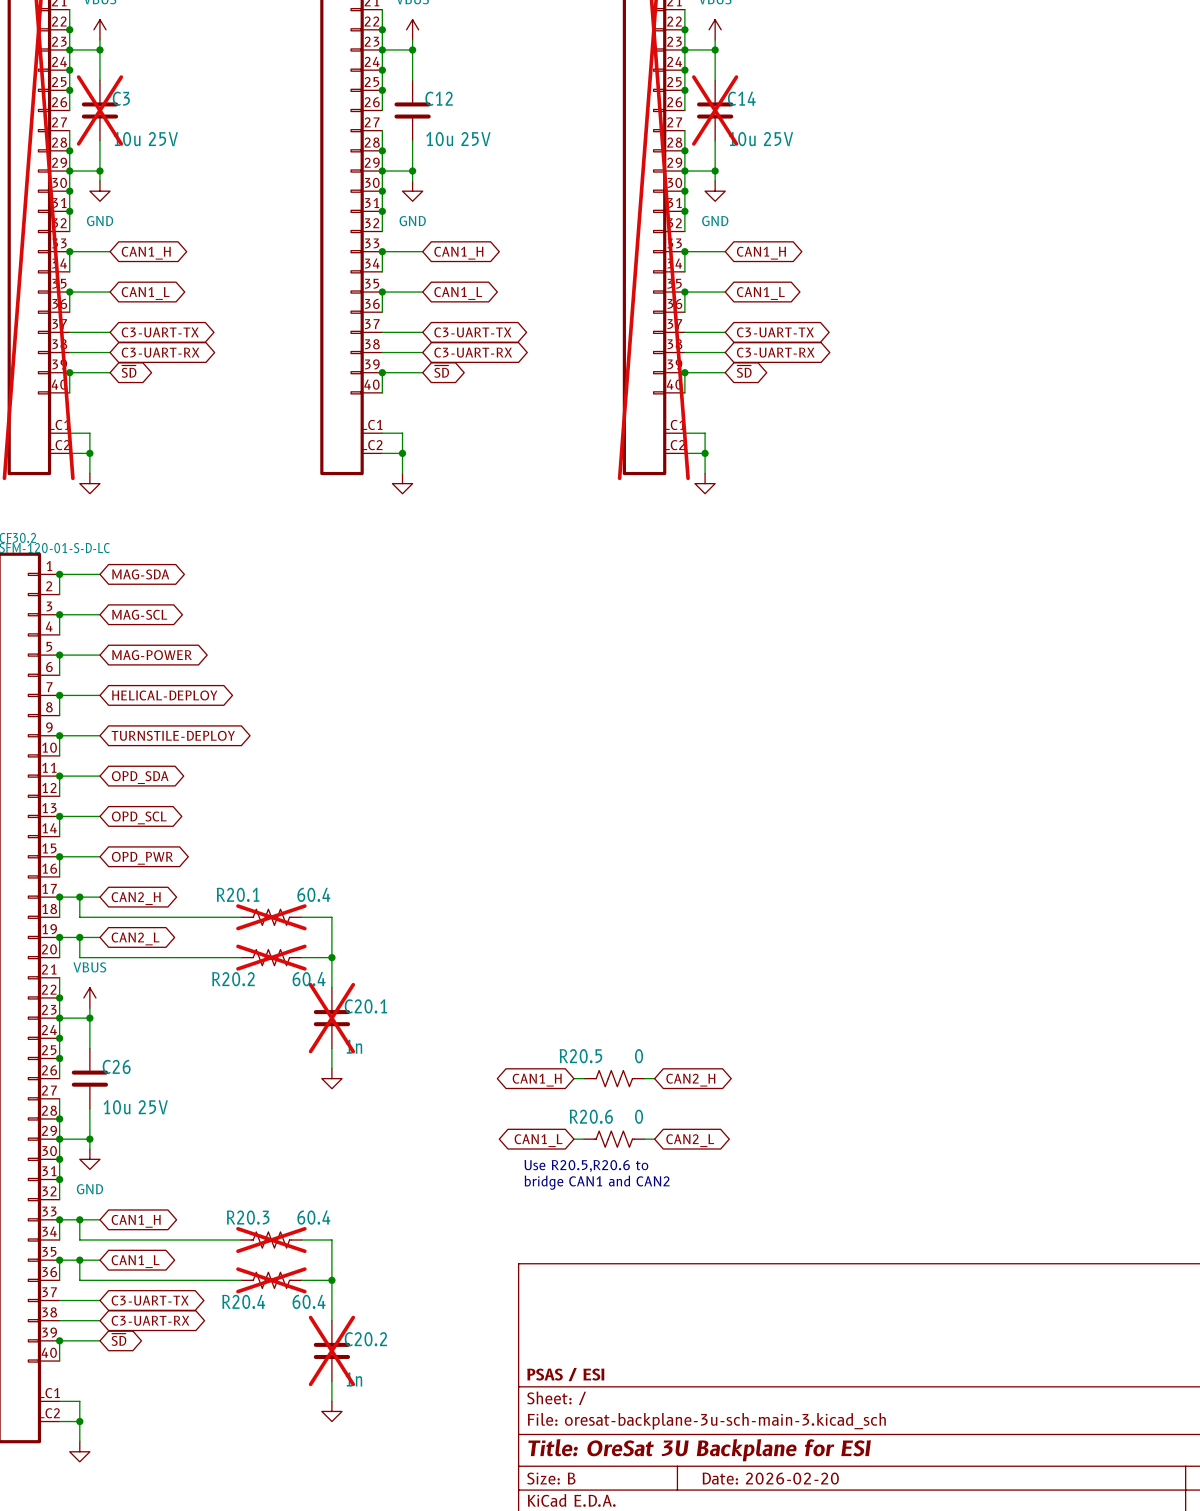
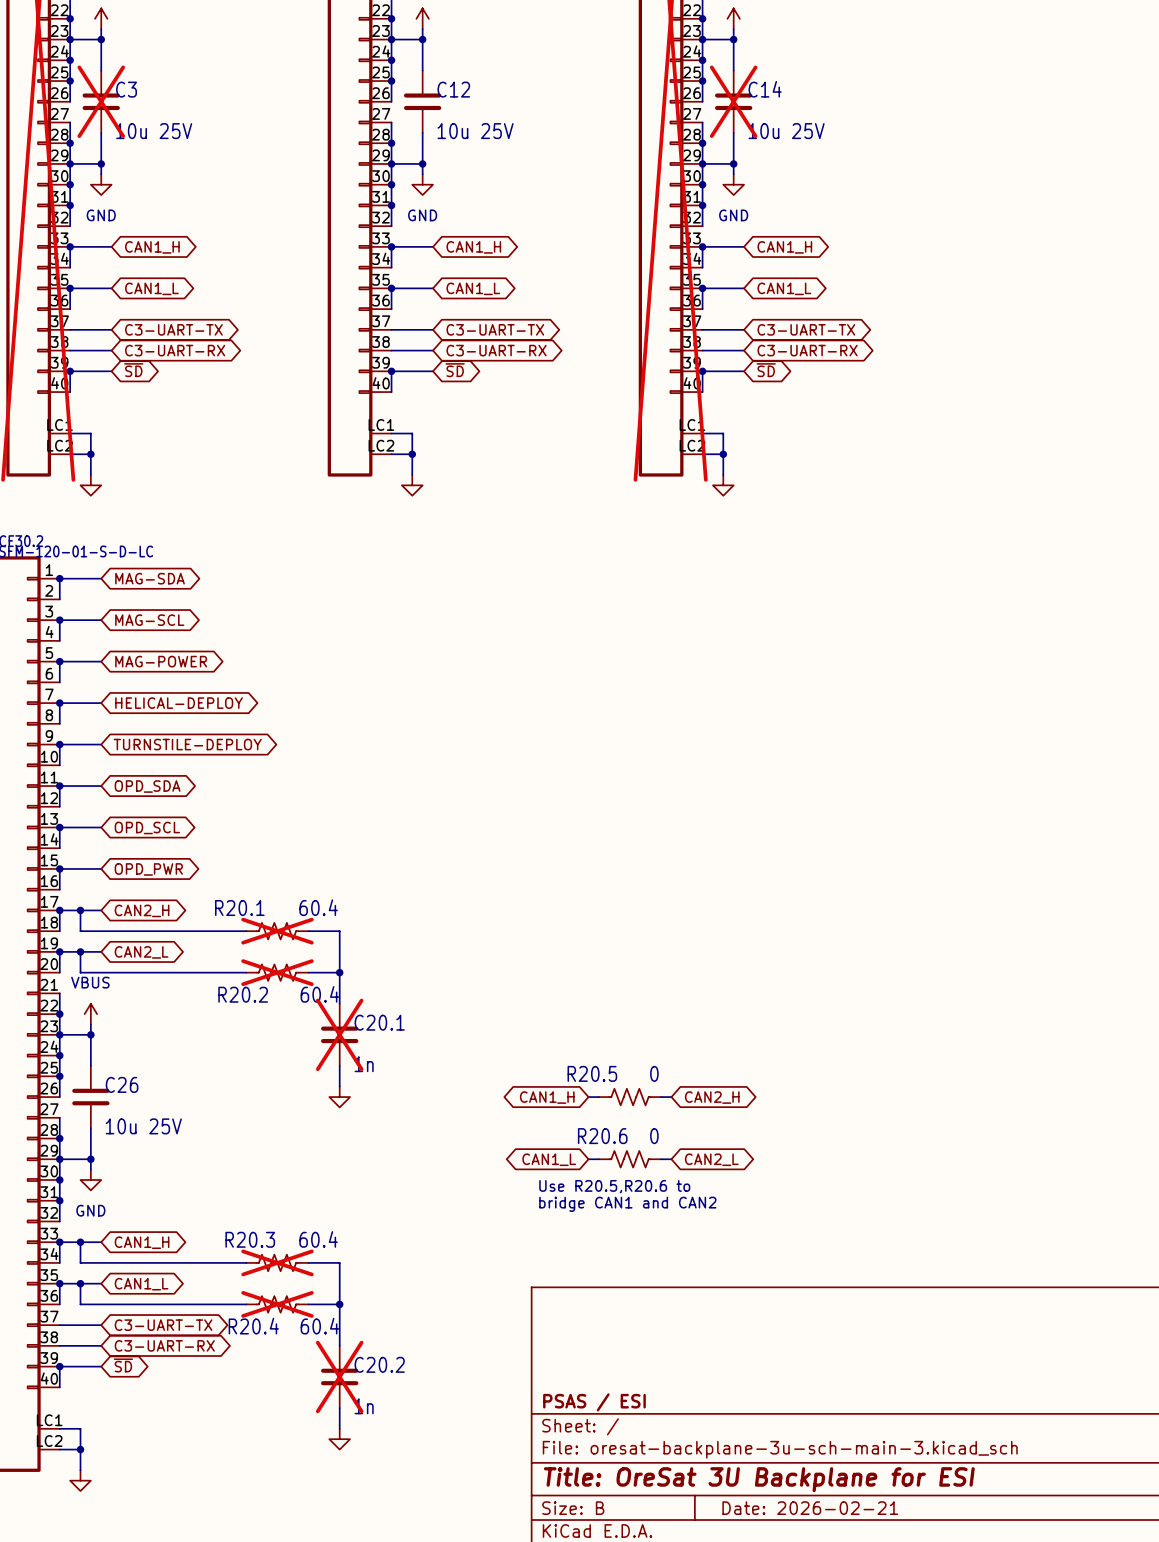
title block: Date: 2026-02-20 (770, 1478) -> Date: 2026-02-21 (810, 1508)

